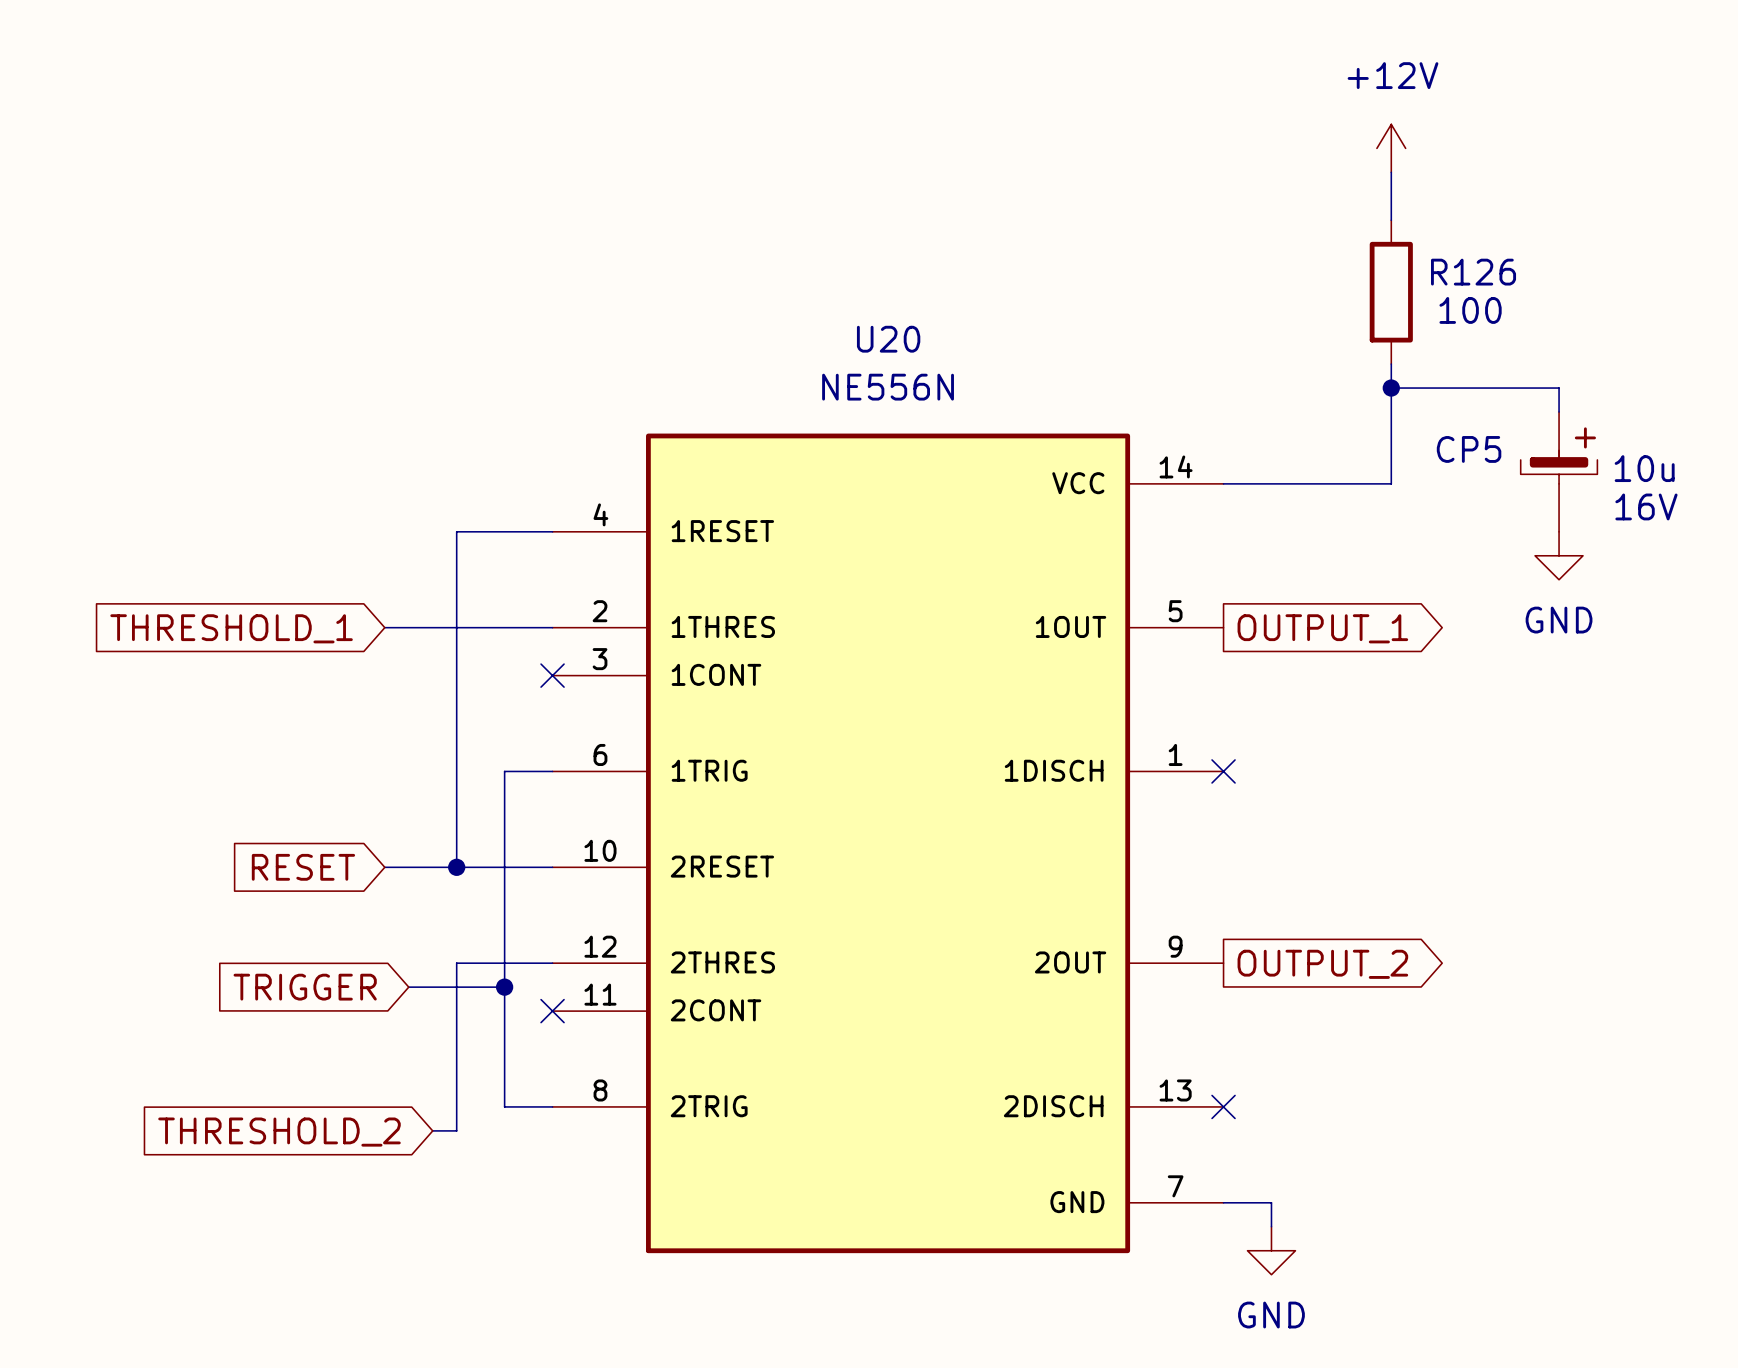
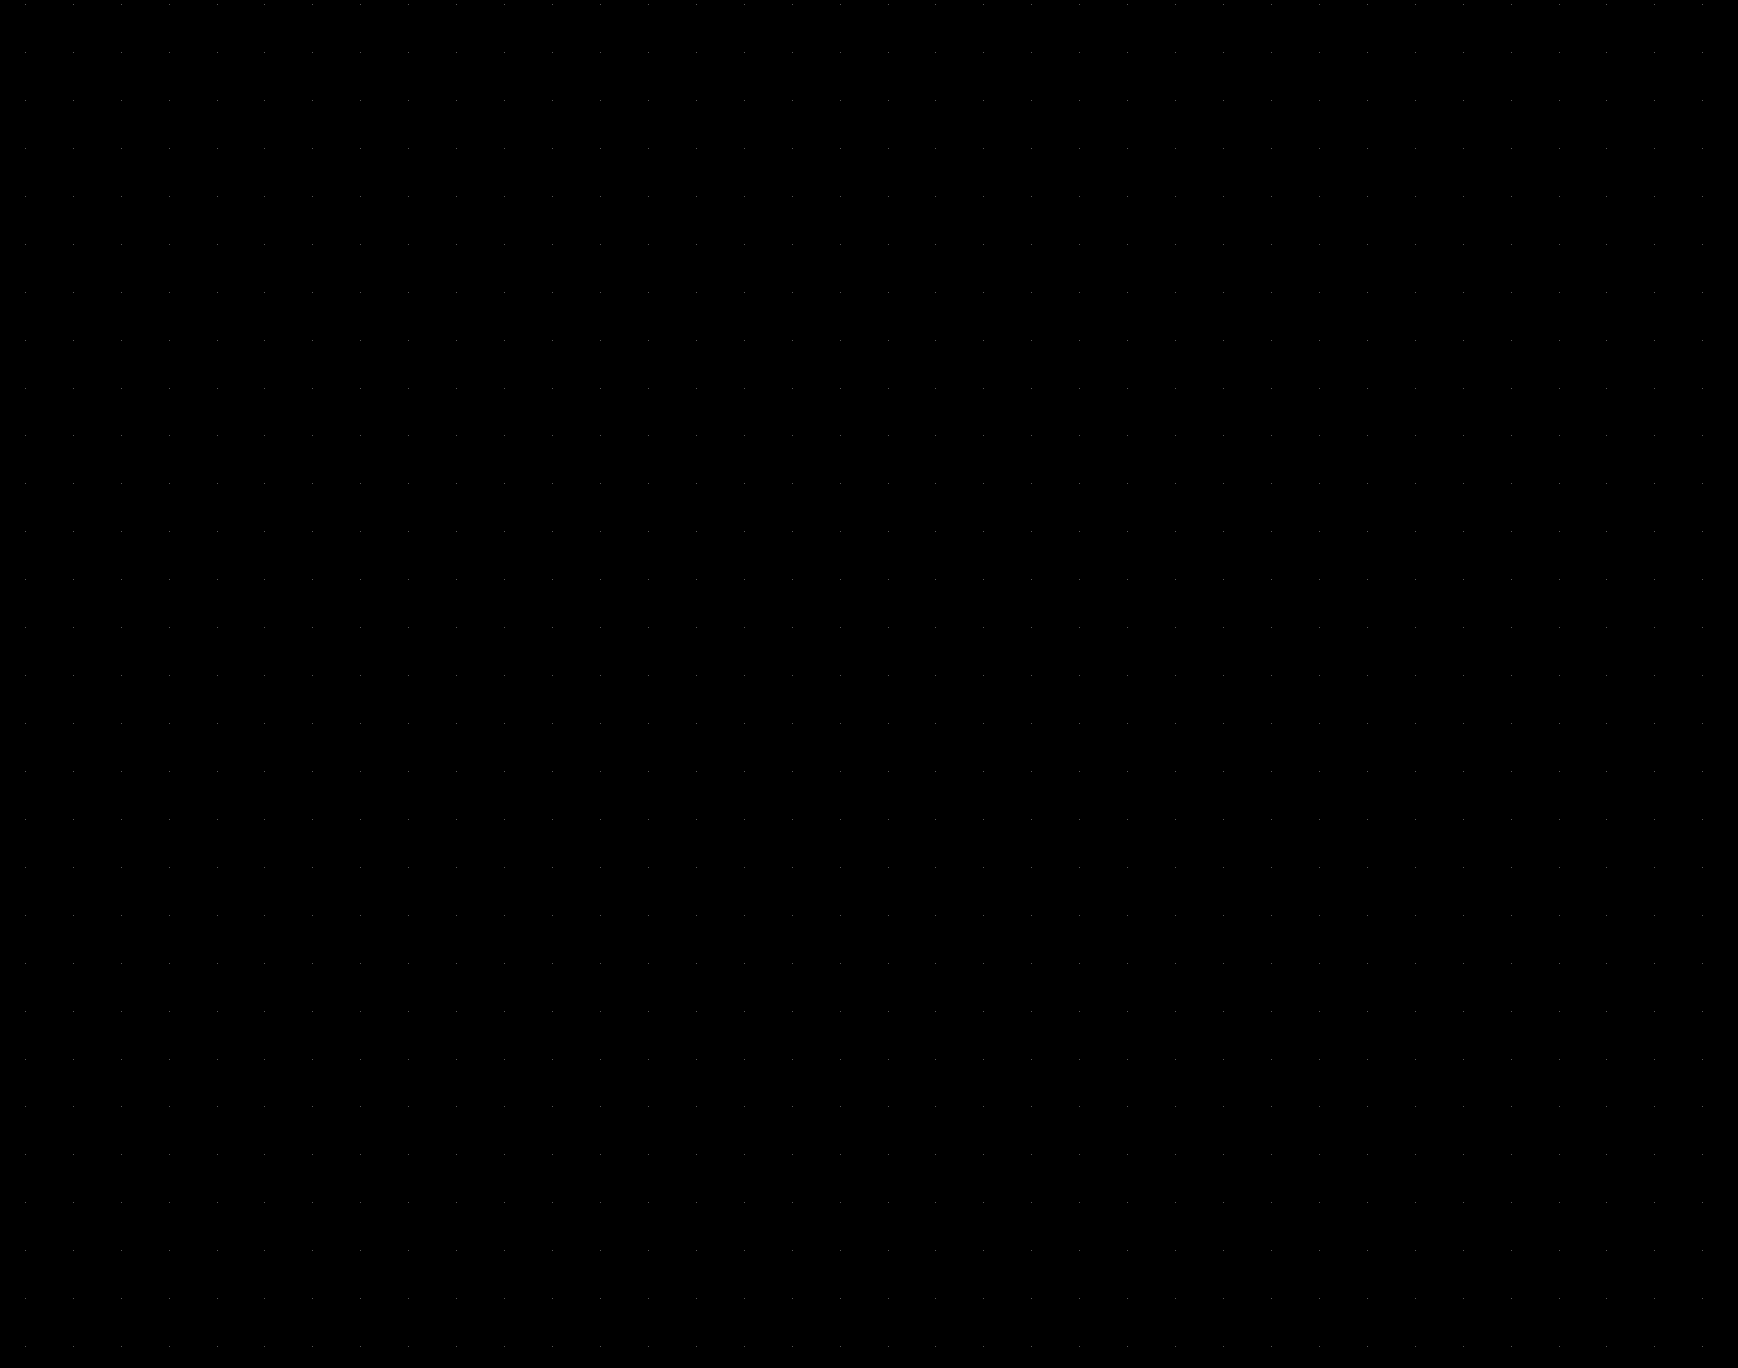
power symbol: +12V (1391, 148) -> none
wire: (1391, 172) (1391, 220) -> none
R126: 100 (1391, 292) -> none
wire: (1391, 364) (1391, 483) (1223, 483) -> none
wire: (1391, 388) (1559, 388) (1559, 412) -> none
junction: (1391, 388) -> none
CP5: 10u (1551, 471) -> none
wire: (552, 531) (456, 531) (456, 867) -> none
power symbol: GND (1559, 555) -> none
wire: (384, 627) (552, 627) -> none
global label: THRESHOLD_1 (231, 628) -> none
global label: OUTPUT_1 (1322, 628) -> none
no-connect mark: (552, 675) -> none
wire: (552, 771) (504, 771) (504, 1106) (552, 1106) -> none
no-connect mark: (1223, 771) -> none
U20: NE556N (888, 843) -> none
global label: RESET (303, 867) -> none
wire: (384, 867) (552, 867) -> none
junction: (456, 867) -> none
wire: (552, 963) (456, 963) (456, 1130) (432, 1130) -> none
global label: OUTPUT_2 (1322, 964) -> none
global label: TRIGGER (305, 987) -> none
wire: (408, 987) (504, 987) -> none
junction: (504, 987) -> none
no-connect mark: (552, 1011) -> none
no-connect mark: (1223, 1106) -> none
global label: THRESHOLD_2 (279, 1132) -> none
wire: (1223, 1202) (1271, 1202) (1271, 1226) -> none
power symbol: GND (1271, 1250) -> none

